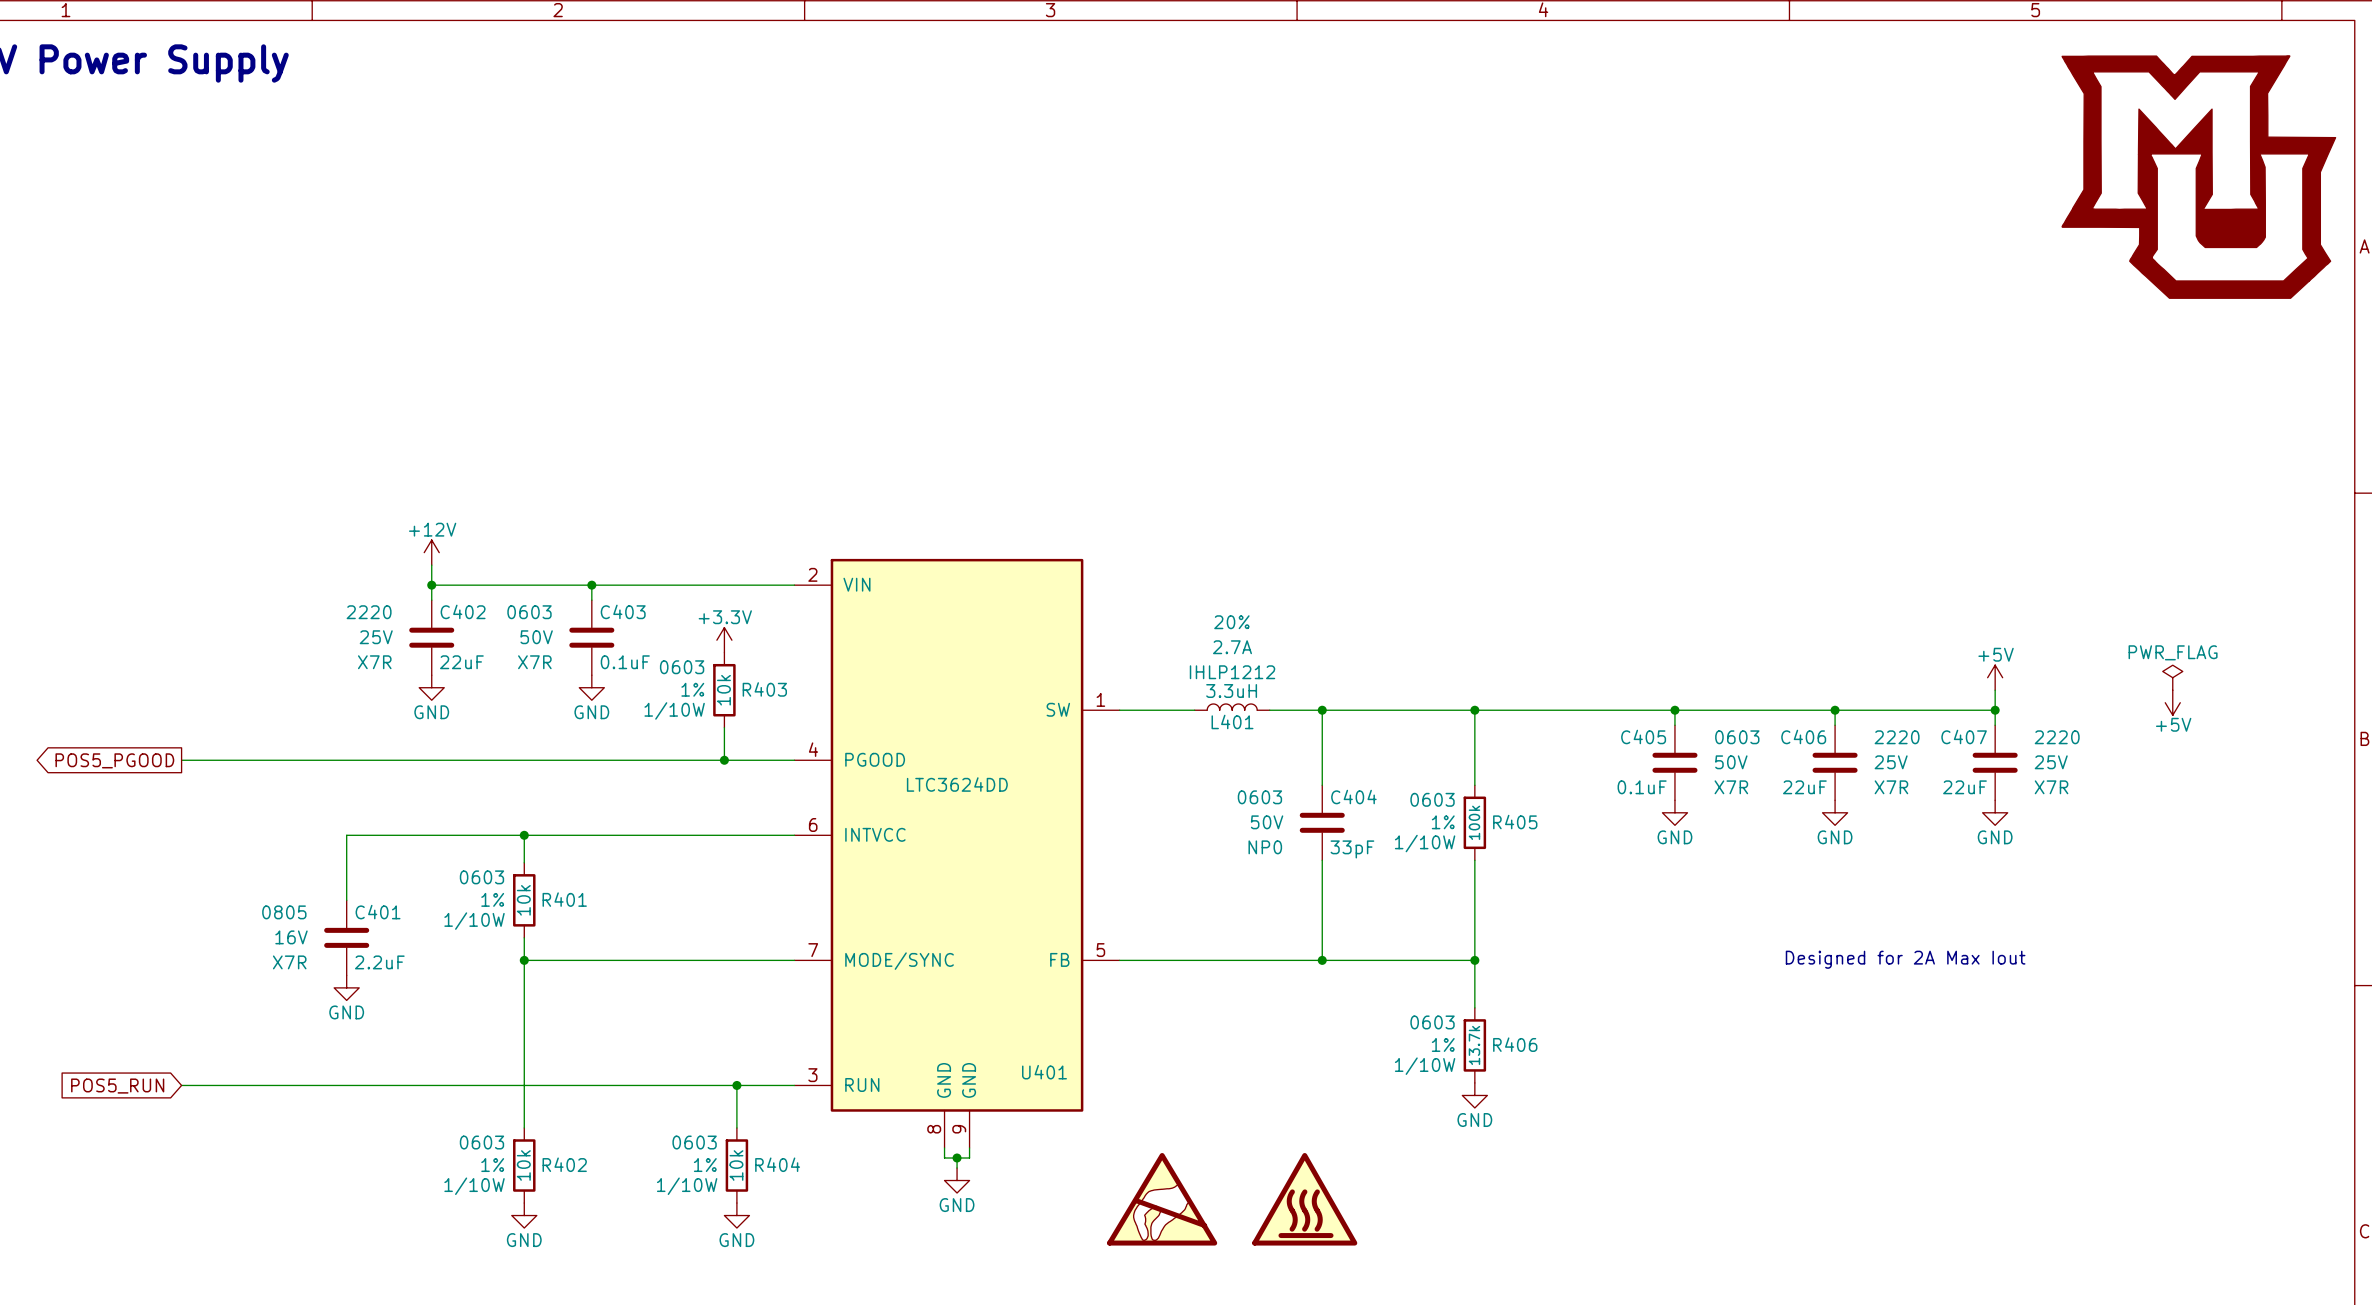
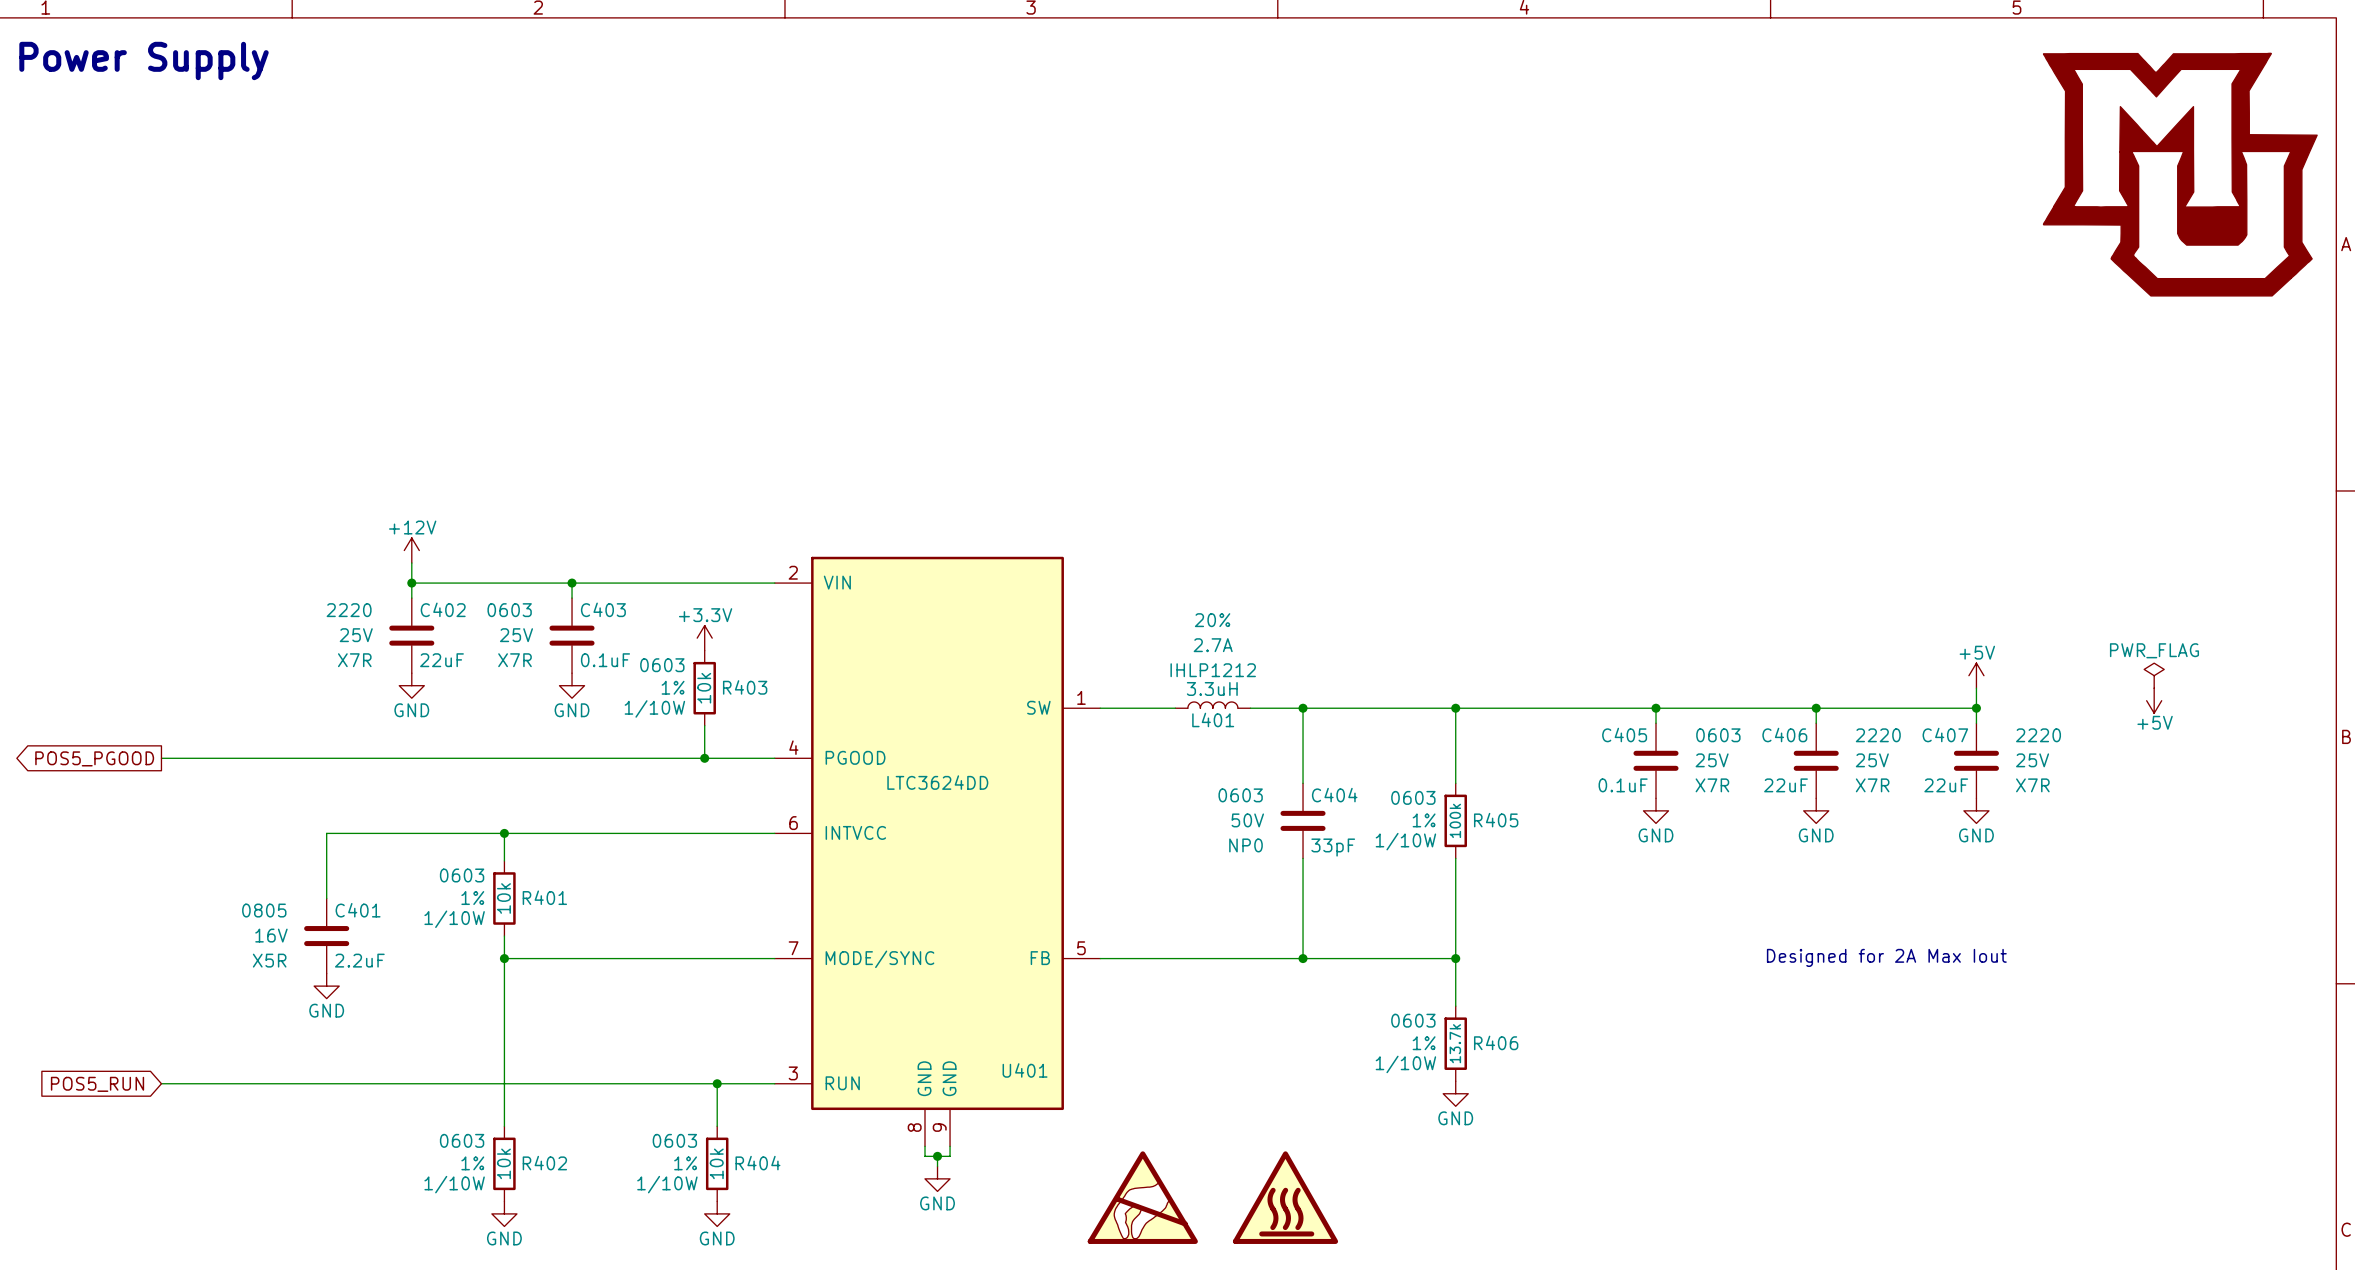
C403 text: 50V (536, 637) -> 25V (516, 635)
C405 text: 50V (1731, 762) -> 25V (1712, 760)
C401 text: X7R (289, 962) -> X5R (269, 960)

